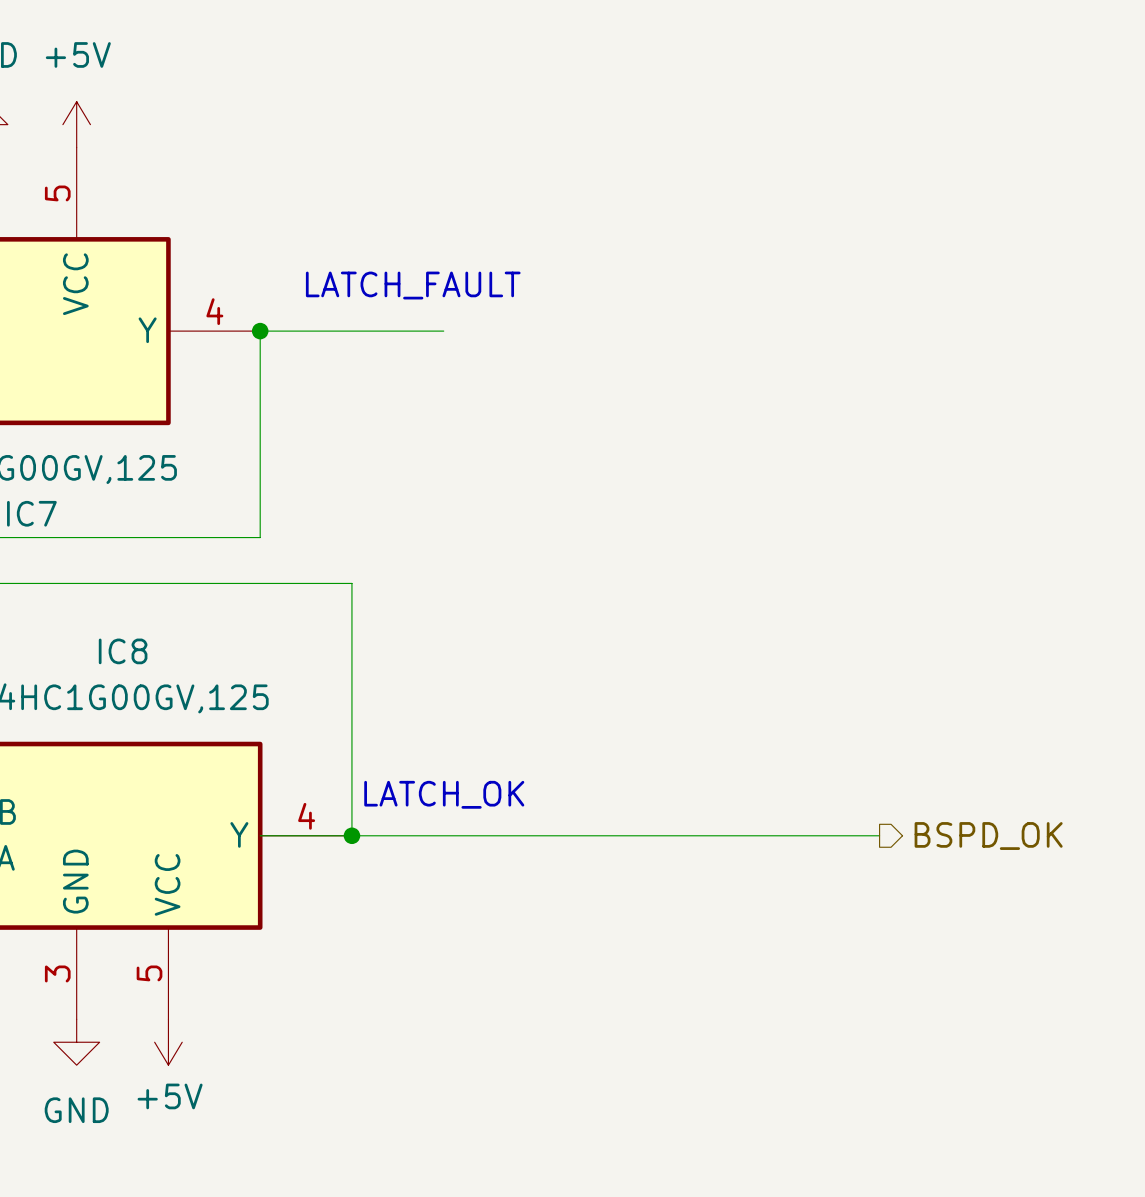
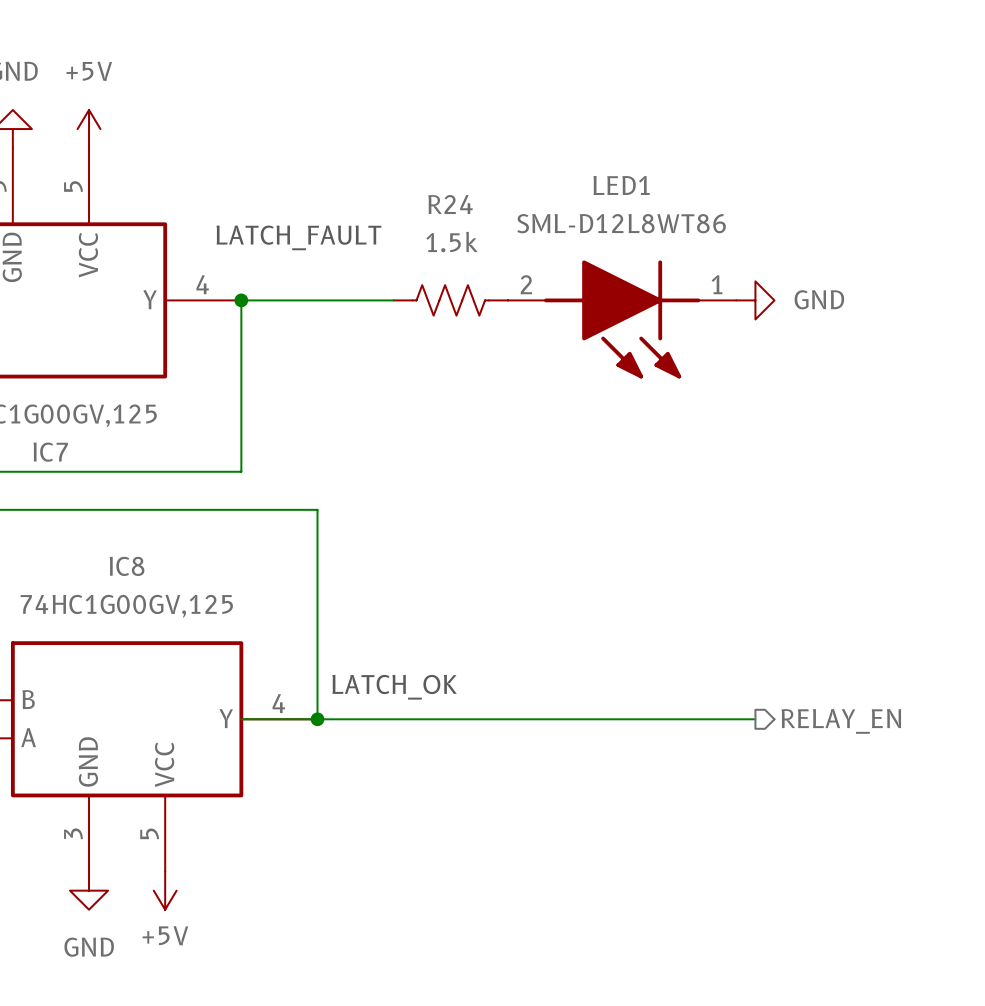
text position: LATCH_FAULT (413, 285) -> LATCH_FAULT (298, 237)
R24: none -> 1.5k (450, 300)
power symbol: none -> GND (755, 300)
LED1: none -> SML-D12L8WT86 (622, 319)
hierarchical label: BSPD_OK (988, 836) -> RELAY_EN (841, 721)

